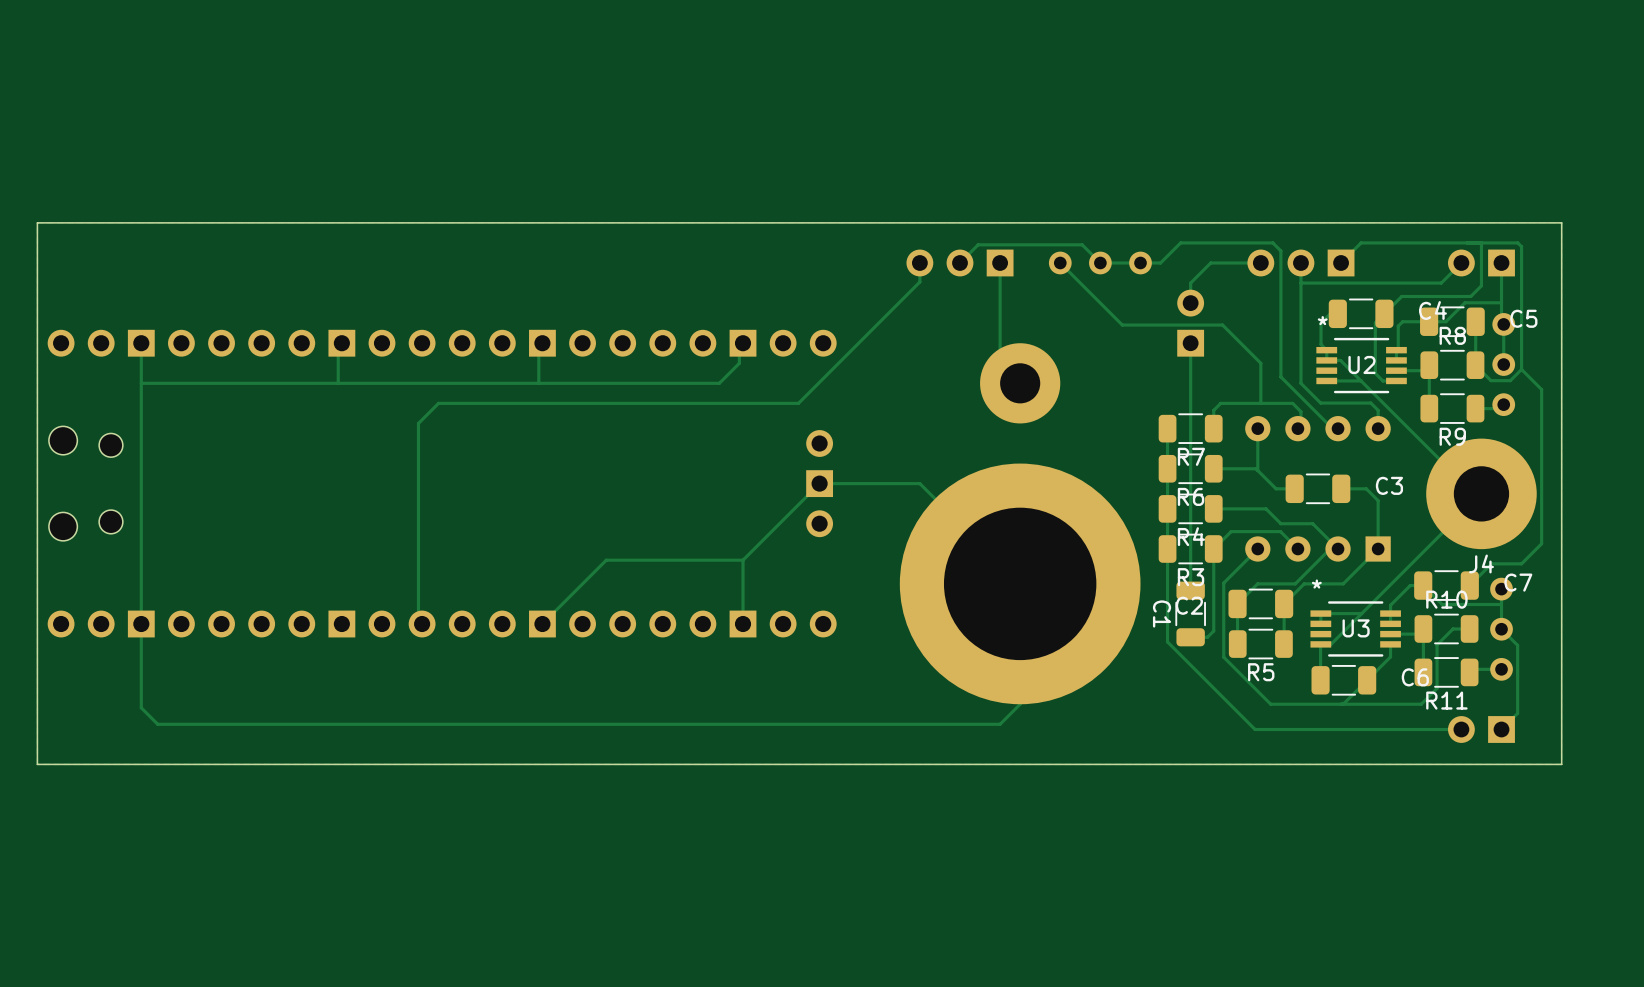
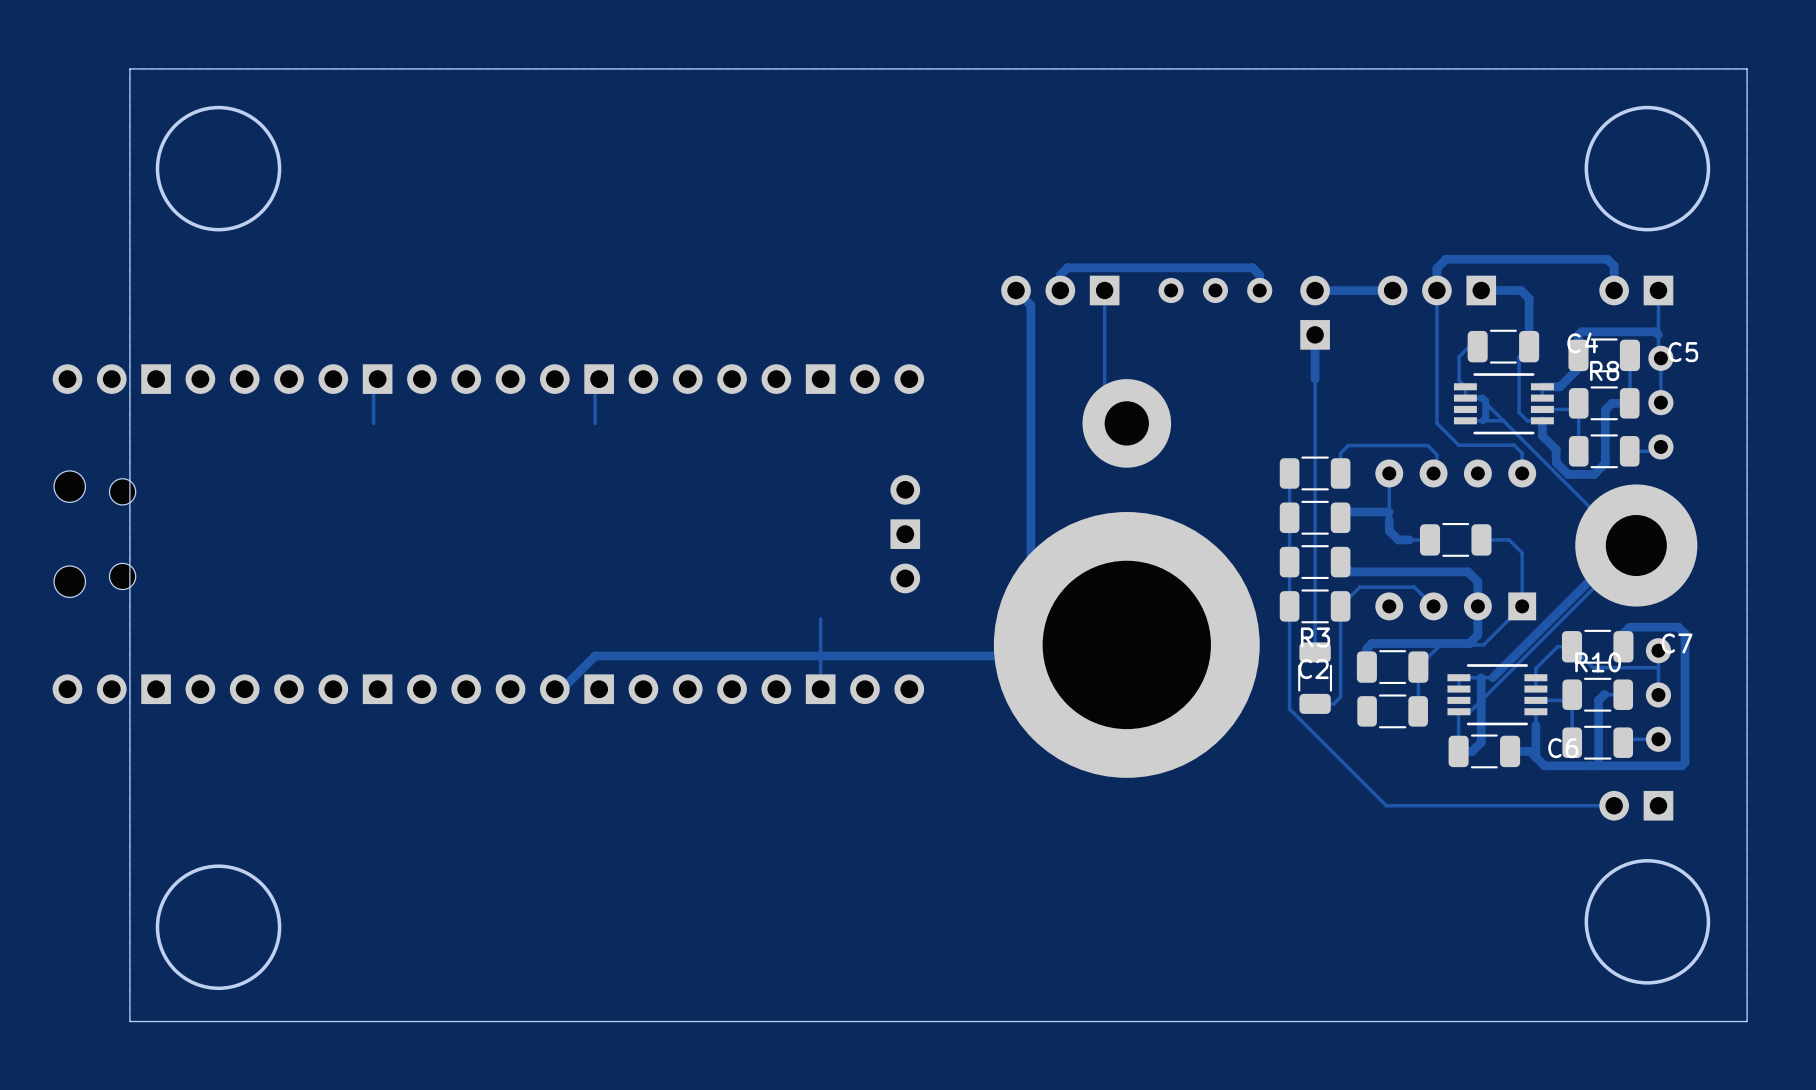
round board edge: none -> [155, 105, 282, 232]
round board edge: none -> [1584, 105, 1711, 232]
board edge: (1561, 222) (37, 222) (37, 764) (1561, 764) (1561, 222) -> (1747, 68) (1747, 1021) (129, 1021) (129, 68) (1747, 68)
track: (1481, 242) (1481, 285) (1470, 296) (1401, 296) (1384, 313) -> (1481, 290) (1521, 290) (1529, 298) (1529, 346)
track: (919, 262) (919, 281) (798, 403) (438, 403) (418, 423) (418, 620) (422, 624) -> (1016, 290) (1030, 305) (1030, 641) (1016, 656) (595, 656) (561, 689)
track: (960, 262) (978, 244) (1082, 244) (1100, 262) (1160, 262) (1180, 242) (1272, 242) (1280, 250) (1280, 376) (1332, 428) (1338, 428) -> (1060, 290) (1060, 274) (1067, 267) (1252, 267) (1259, 274) (1259, 290)
track: (1060, 262) (1122, 325) (1222, 325) (1260, 363) (1260, 403) -> none
track: (1260, 262) (1210, 262) (1190, 283) (1190, 303) -> (1392, 290) (1315, 290)
track: (1341, 262) (1361, 242) (1517, 242) (1521, 246) (1521, 369) -> none
track: (1461, 262) (1441, 283) (1300, 283) -> (1614, 290) (1614, 266) (1607, 259) (1446, 259) (1436, 268) (1436, 290)
track: (1501, 302) (1464, 302) (1445, 321) (1402, 321) (1398, 326) (1398, 348) (1396, 350) -> (1658, 334) (1655, 331) (1581, 331) (1578, 335) (1578, 368) (1559, 386) (1542, 386)
track: none -> (1315, 334) (1315, 379)
U2 text: * (1322, 320) -> none
part position: (1190, 323) -> (1315, 312)
track: (141, 343) (141, 707) (157, 724) (1000, 724) (1020, 704) (1020, 583) (919, 483) (819, 483) (743, 560) (606, 560) (542, 624) -> none
track: (743, 343) (739, 346) (739, 363) (719, 383) (141, 383) -> none
track: none -> (1480, 398) (1485, 401) (1485, 418) (1483, 420)
U2 name: U2 (1361, 364) -> none
track: (1475, 365) (1490, 380) (1510, 380) (1521, 369) -> (1629, 403) (1612, 403) (1605, 410) (1605, 463) (1594, 474) (1568, 474) (1556, 462) (1556, 449) (1542, 435) (1542, 420)
track: (1521, 369) (1541, 389) (1541, 543) (1521, 563) (1491, 563) (1469, 585) -> (1510, 751) (1530, 751) (1544, 765) (1681, 765) (1685, 762) (1685, 633) (1678, 627) (1629, 627) (1623, 633) (1623, 646)
R9 name: R9 (1452, 436) -> none
R7 name: R7 (1191, 456) -> none
track: (1213, 468) (1256, 468) (1276, 488) -> (1340, 517) (1346, 512) (1389, 512)
track: none -> (1389, 519) (1389, 530) (1398, 539) (1409, 539)
C3 name: C3 (1389, 485) -> none
R6 name: R6 (1191, 496) -> none
track: (1213, 508) (1266, 508) (1280, 523) (1312, 523) (1338, 548) (1330, 548) (1295, 583) (1257, 583) (1237, 603) (1237, 643) -> (1340, 562) (1350, 571) (1468, 571) (1477, 581) (1477, 634) (1469, 643) (1371, 643) (1366, 648) (1366, 667)
R4 name: R4 (1191, 536) -> none
track: (1257, 548) (1223, 583) (1223, 657) (1270, 704) (1421, 704) (1437, 688) (1437, 644) (1452, 628) -> (1598, 765) (1598, 700) (1604, 694)
J4 name: J4 (1481, 563) -> none
U3 text: * (1316, 584) -> none
C1 name: C1 (1162, 613) -> none
track: none -> (1481, 677) (1481, 742) (1472, 751) (1458, 751)
track: (1361, 613) (1351, 613) -> (1624, 545) (1492, 677)
U3 name: U3 (1356, 628) -> none
track: (1501, 629) (1517, 645) (1517, 713) (1501, 729) -> none
track: (1390, 656) (1343, 704) -> (1535, 725) (1535, 757)
R5 name: R5 (1261, 672) -> none
R11 name: R11 (1446, 700) -> none
round board edge: none -> [1584, 859, 1711, 985]
round board edge: none -> [155, 864, 282, 991]

